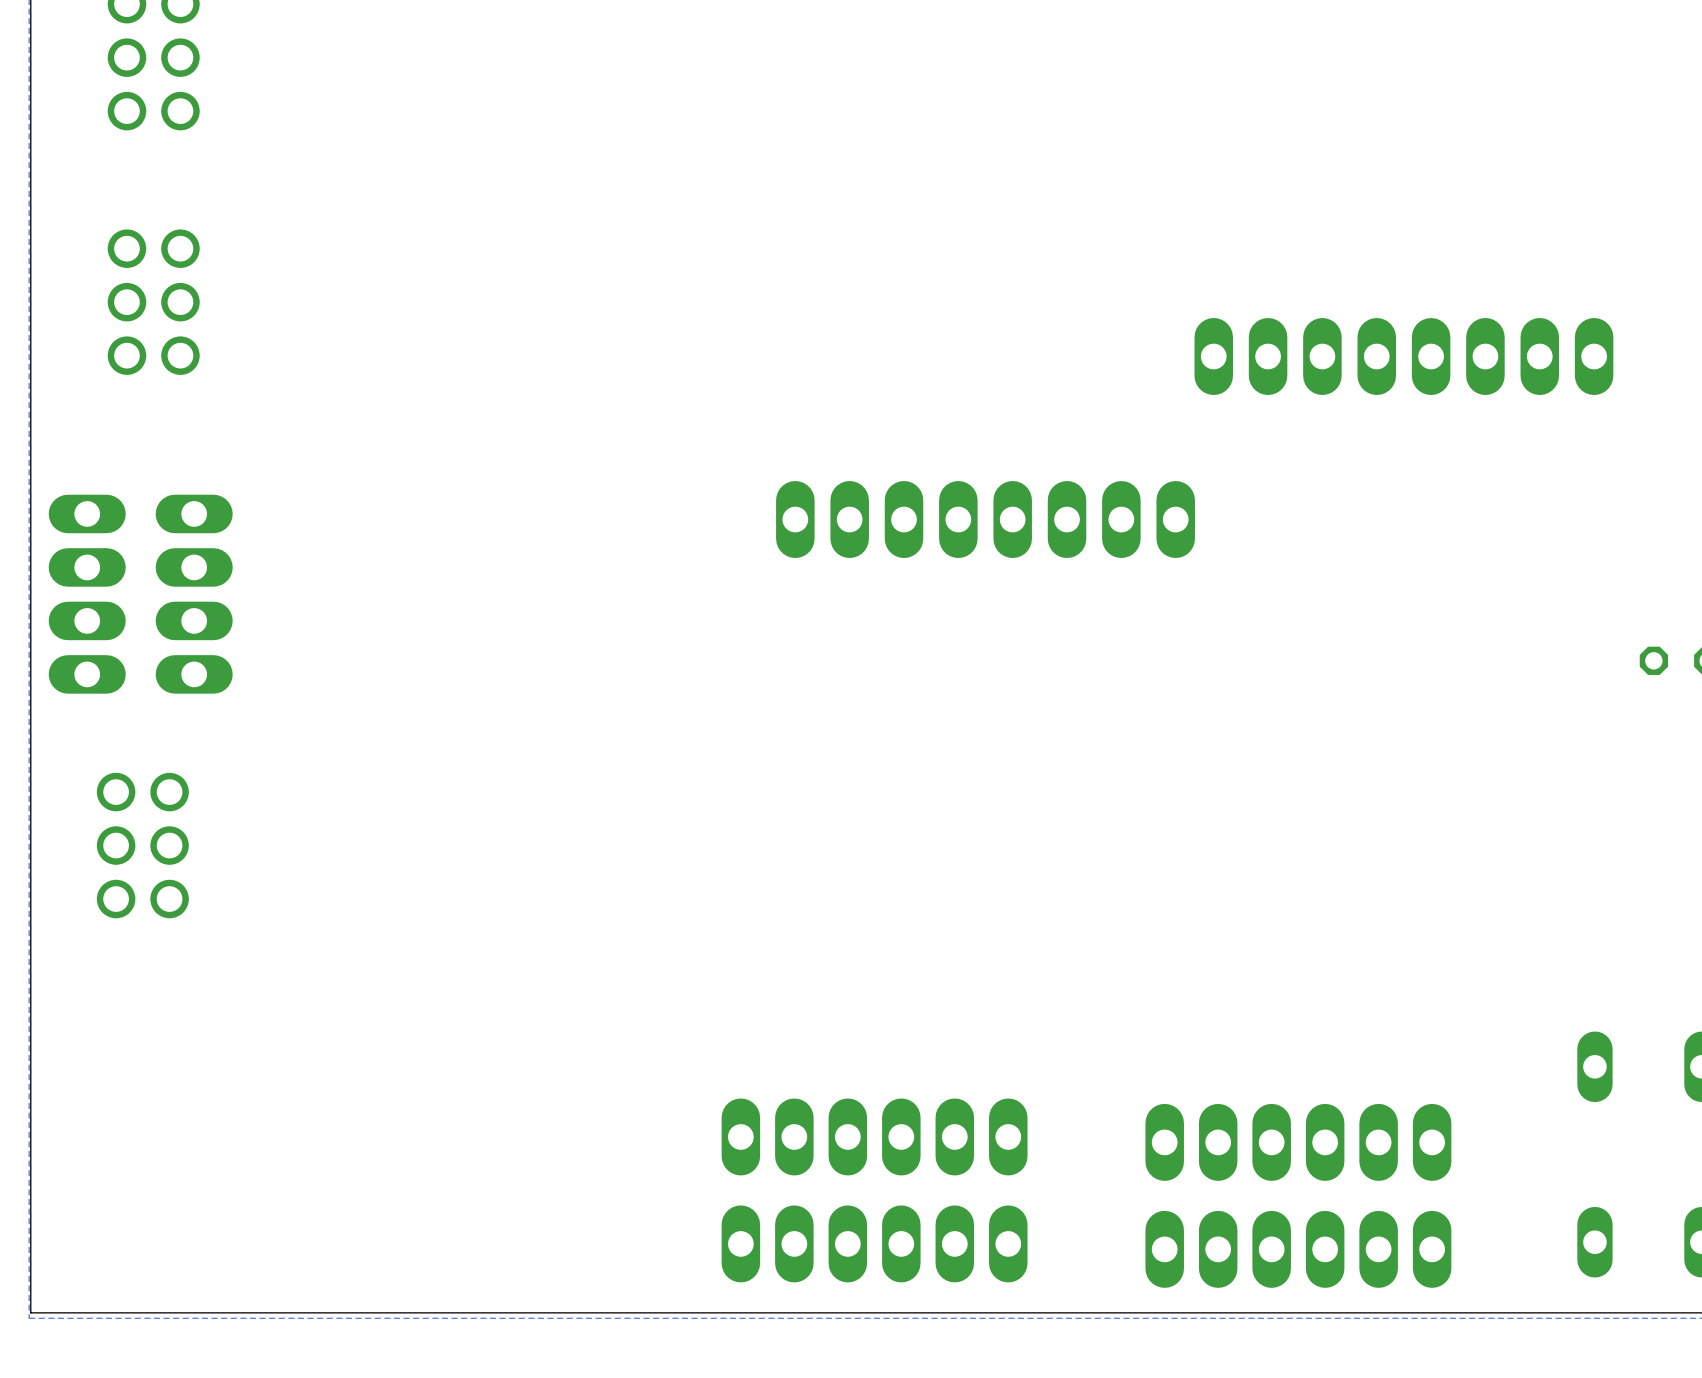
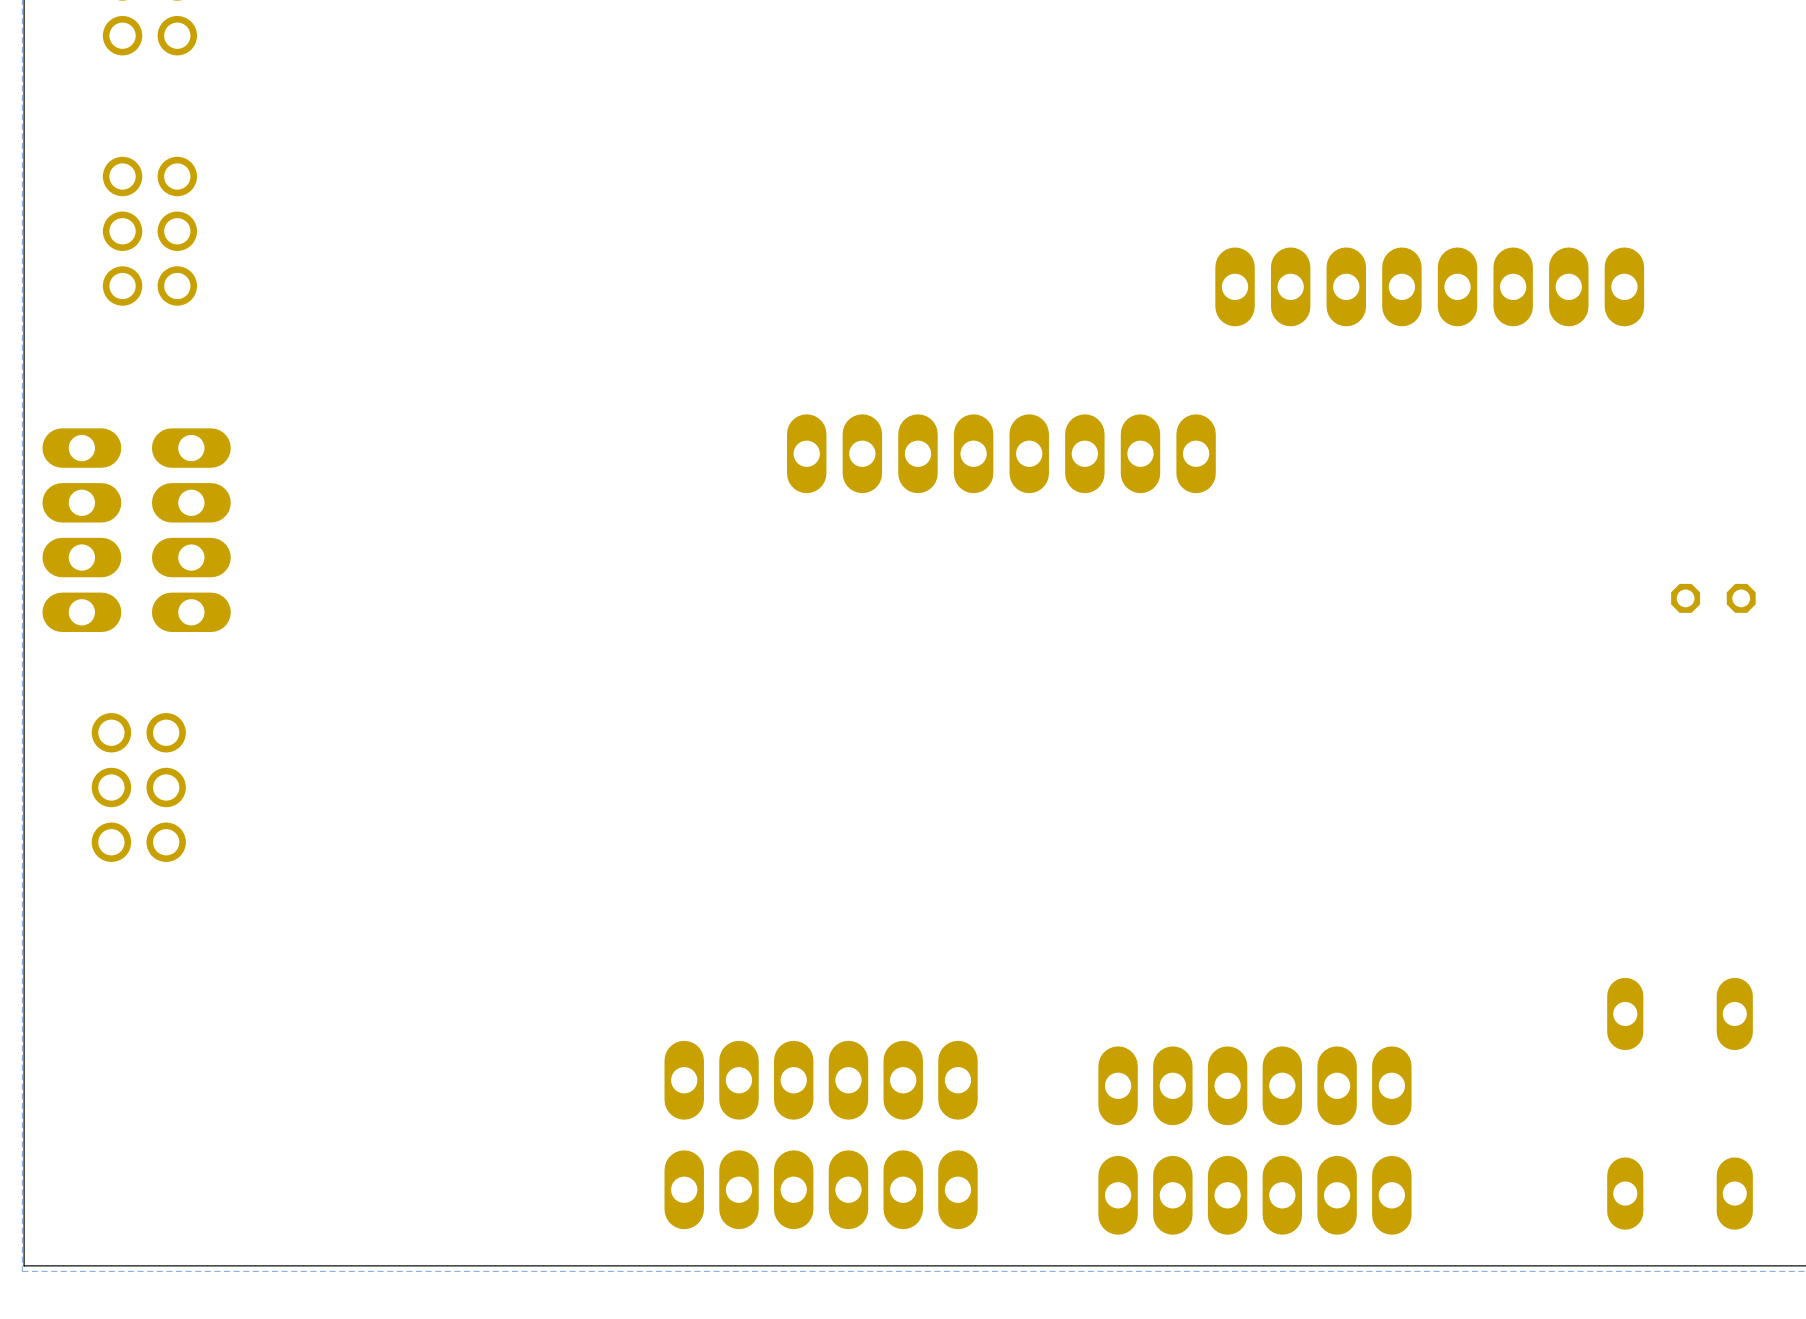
part position: (874, 1190) -> (821, 1135)
part position: (1298, 1195) -> (1254, 1140)

